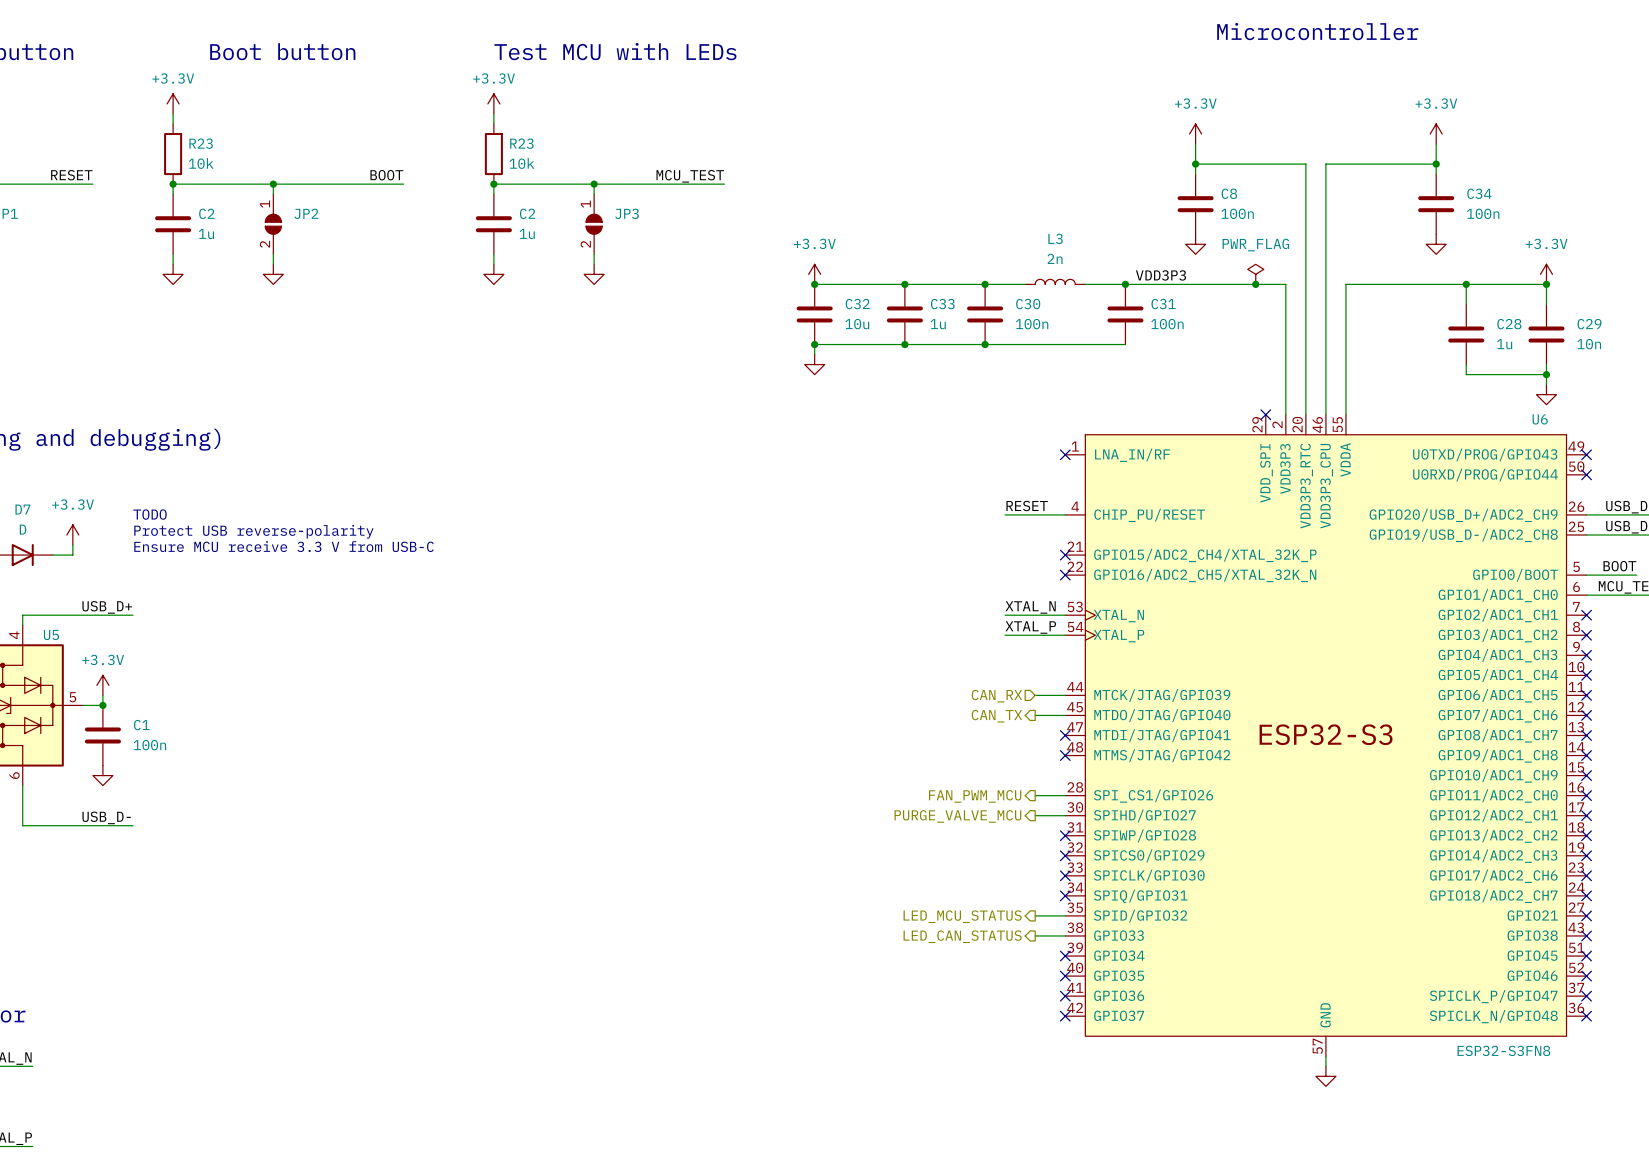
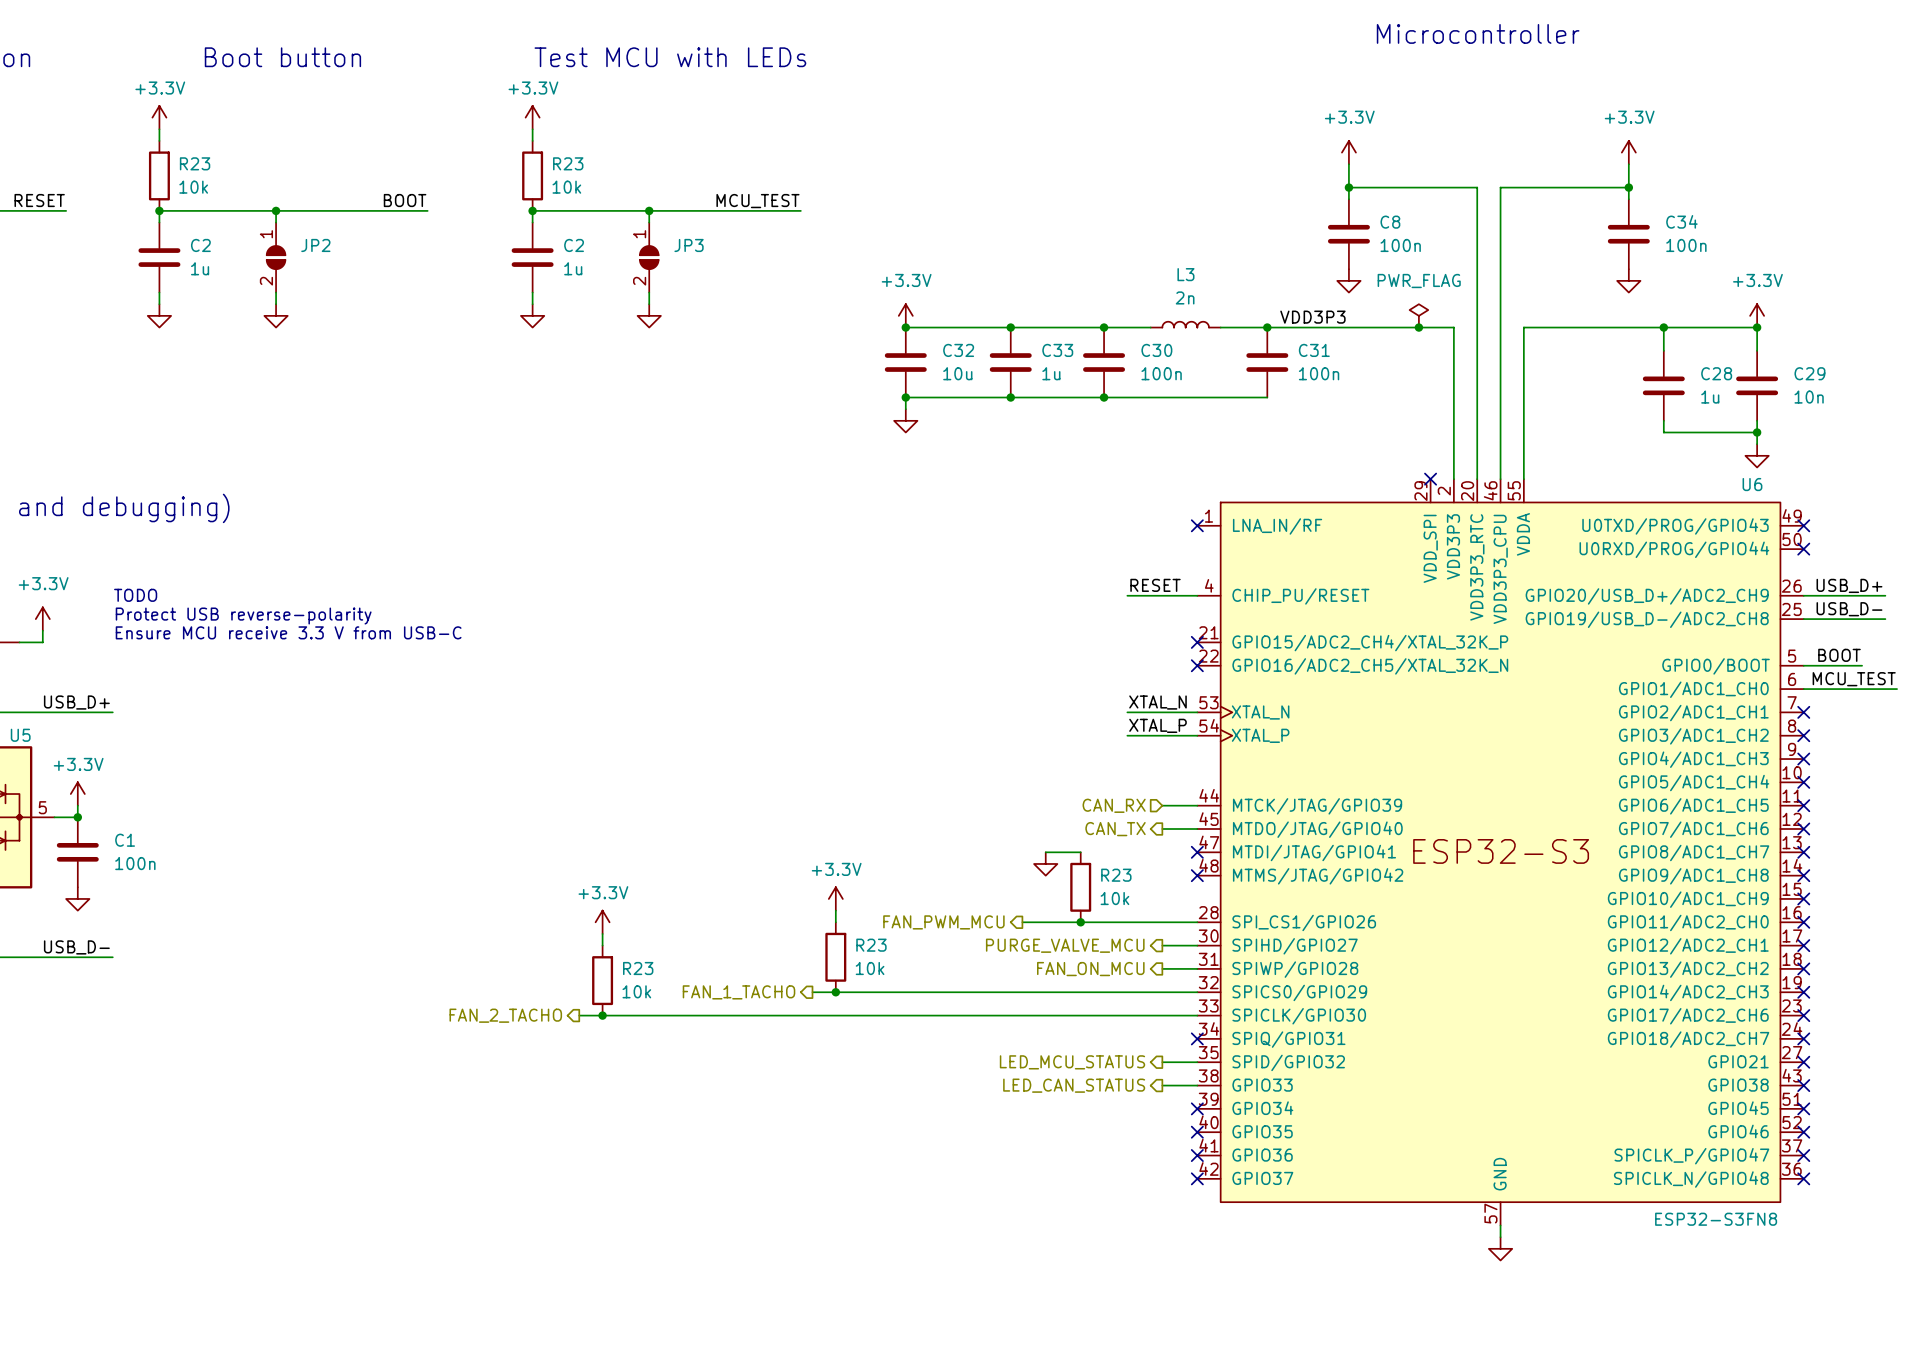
wire: none -> (1045, 852) (1080, 852)
power symbol: none -> (1045, 863)
R23: none -> 10k (1080, 887)
power symbol: none -> +3.3V (835, 898)
wire: none -> (835, 910) (835, 922)
power symbol: none -> +3.3V (602, 922)
wire: none -> (1022, 922) (1162, 922)
junction: none -> (1080, 922)
hierarchical label position: FAN_PWM_MCU (975, 796) -> FAN_PWM_MCU (943, 922)
wire: none -> (602, 933) (602, 945)
R23: none -> 10k (835, 957)
wire: none -> (1162, 968) (1197, 968)
no-connect mark: (1065, 835) -> none
hierarchical label: none -> FAN_ON_MCU (1090, 969)
R23: none -> 10k (602, 980)
wire: none -> (812, 992) (1197, 992)
junction: none -> (835, 992)
no-connect mark: (1065, 855) -> none
hierarchical label: none -> FAN_1_TACHO (739, 992)
wire: none -> (579, 1015) (1197, 1015)
junction: none -> (602, 1015)
no-connect mark: (1065, 875) -> none
hierarchical label: none -> FAN_2_TACHO (505, 1015)

